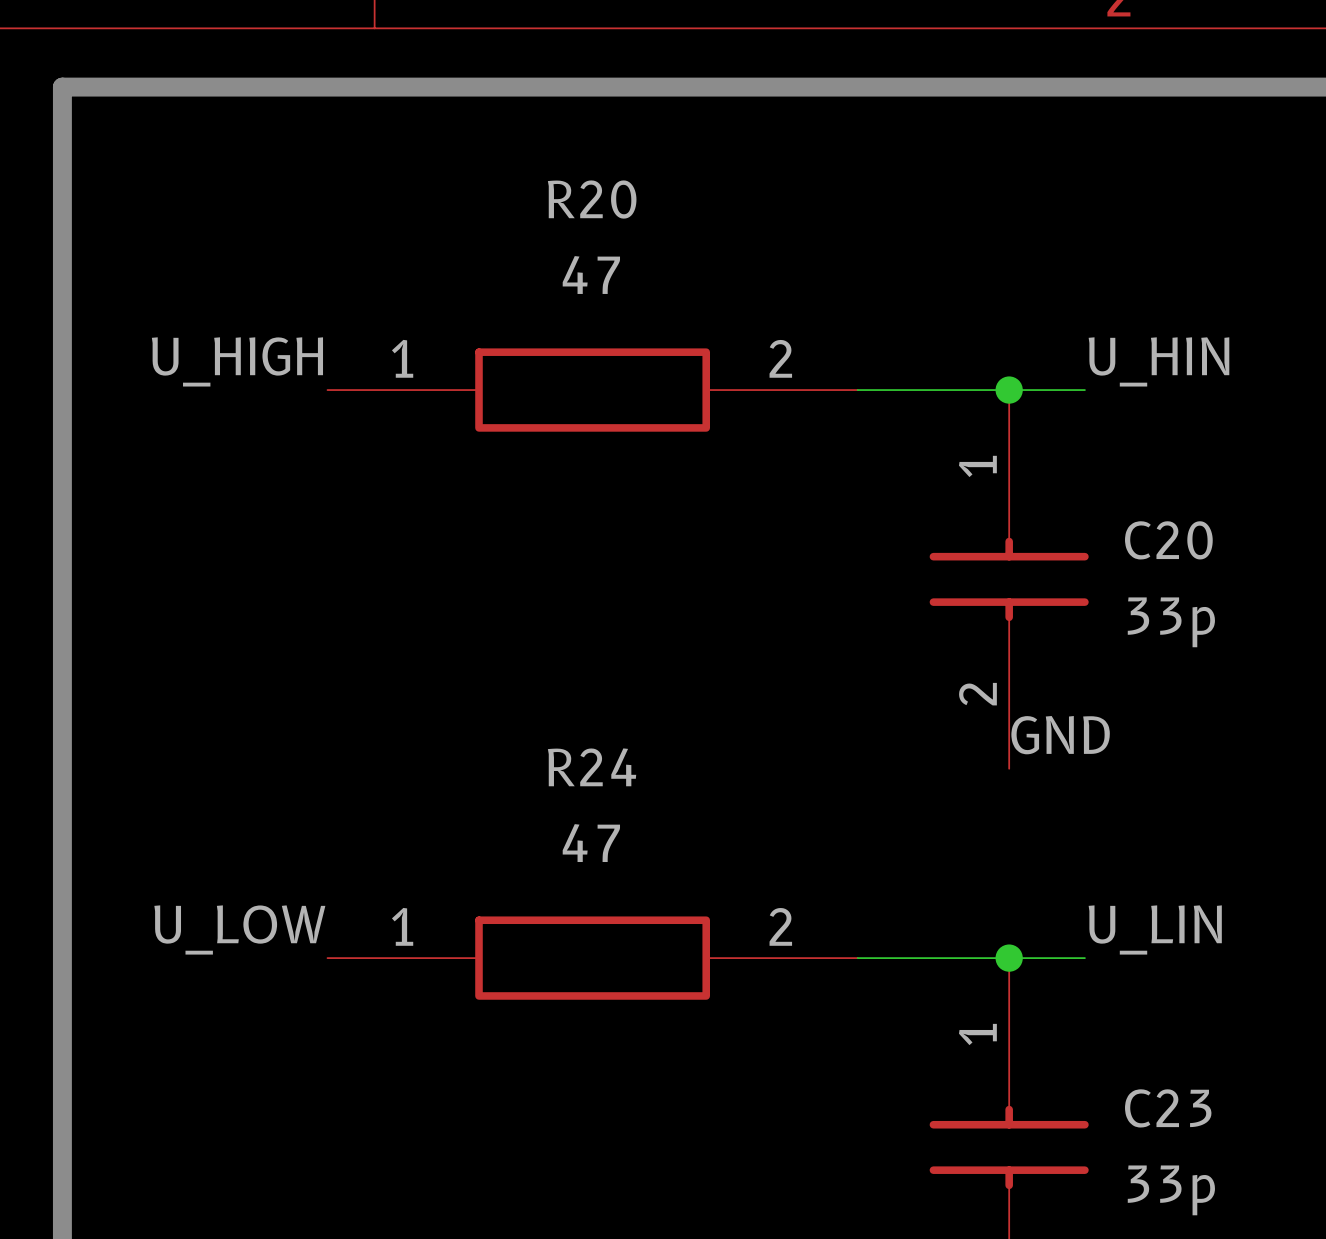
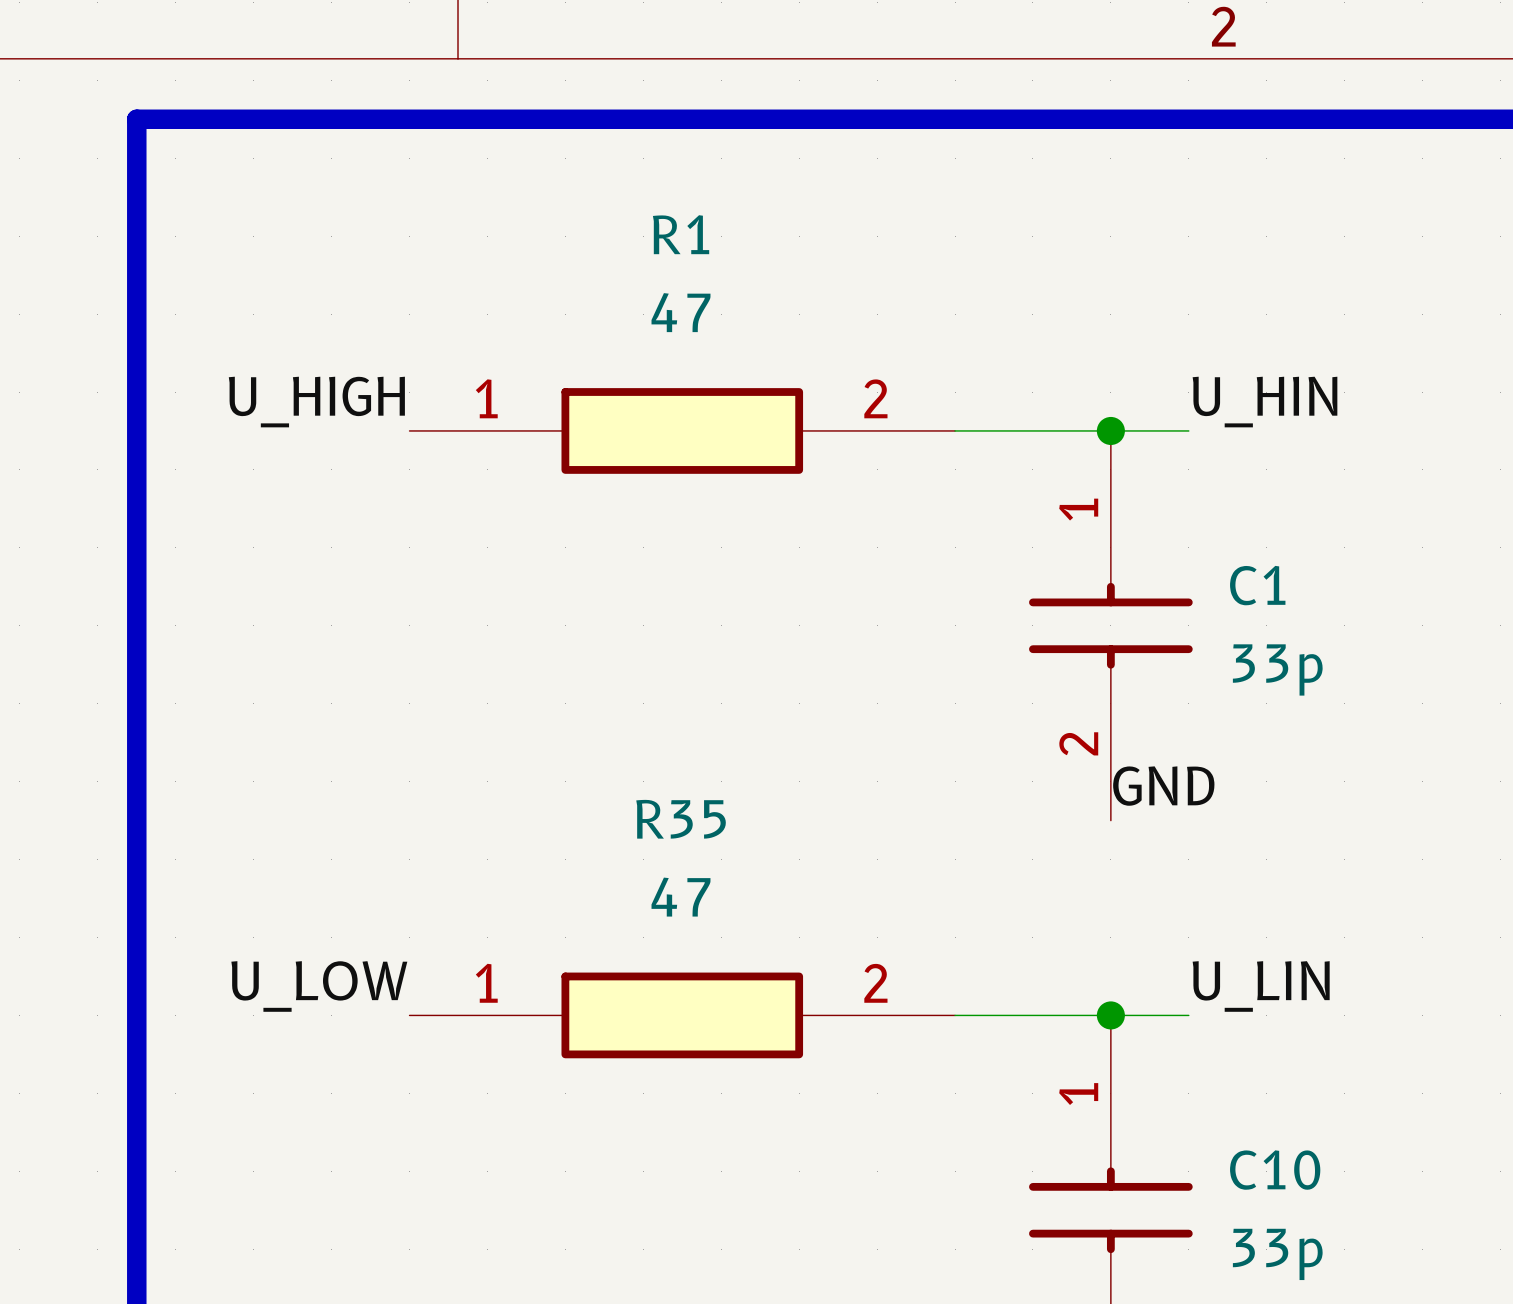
R20 name: R20 (592, 199) -> R1 (681, 234)
C20 name: C20 (1168, 540) -> C1 (1257, 585)
R24 name: R24 (592, 767) -> R35 (681, 819)
C23 name: C23 (1168, 1108) -> C10 (1275, 1170)

